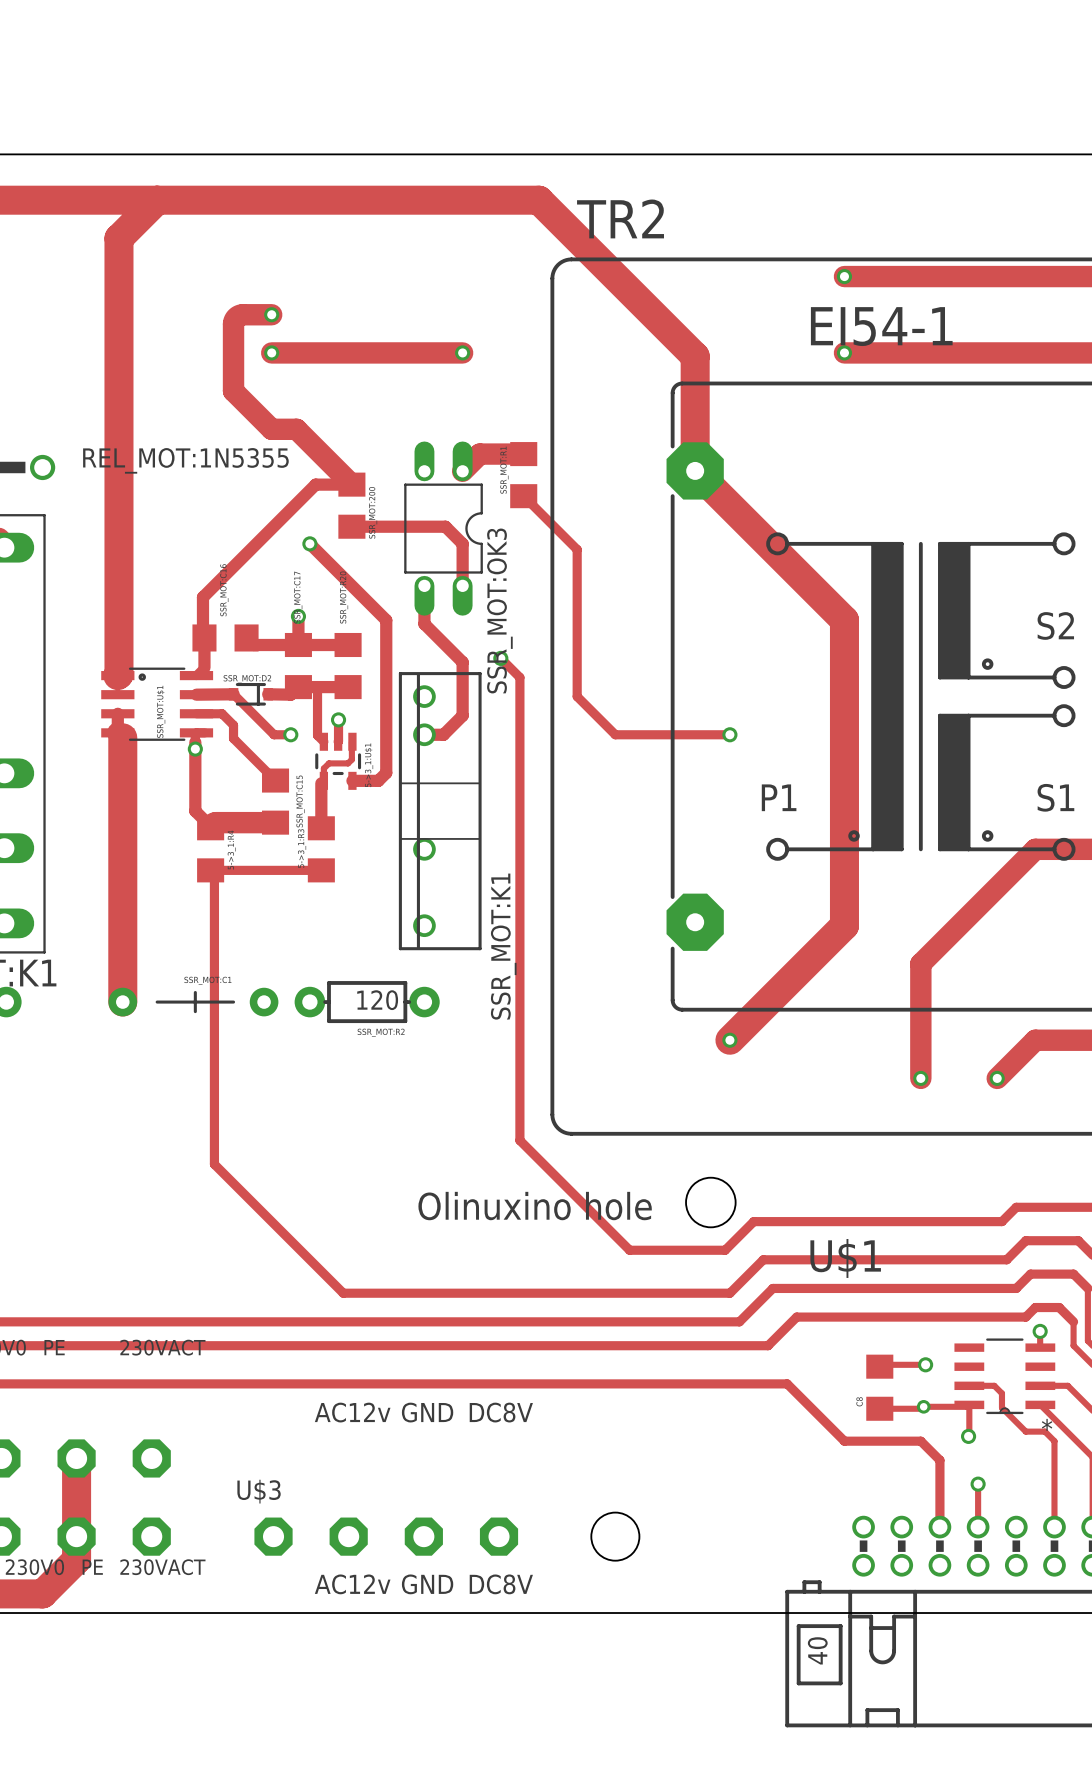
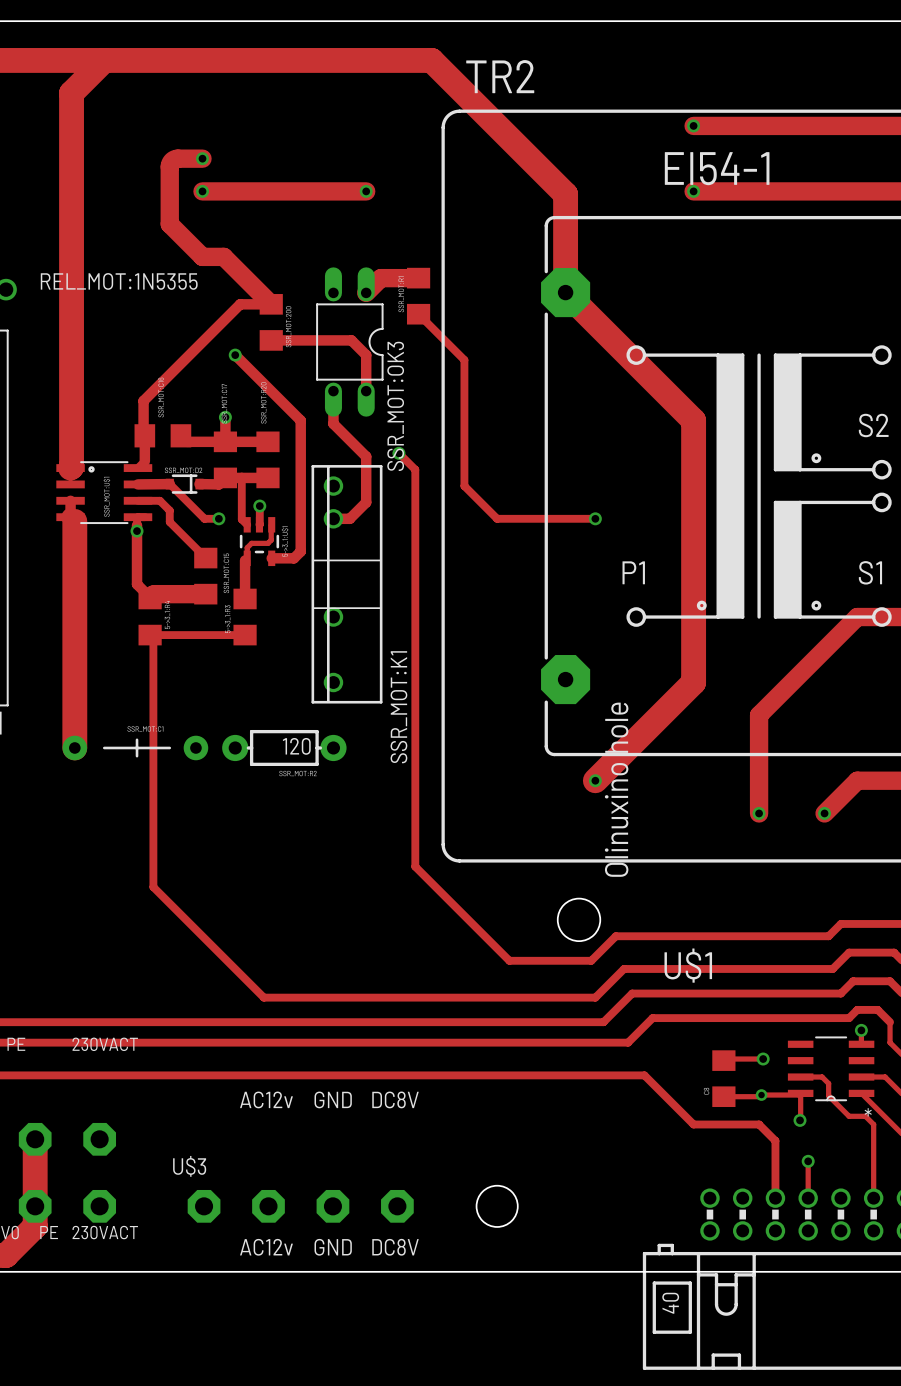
text rotation: 0° (535, 1206) -> 90° counterclockwise (616, 789)
text position: Olinuxino hole (535, 1206) -> Olinuxino hole (616, 789)

